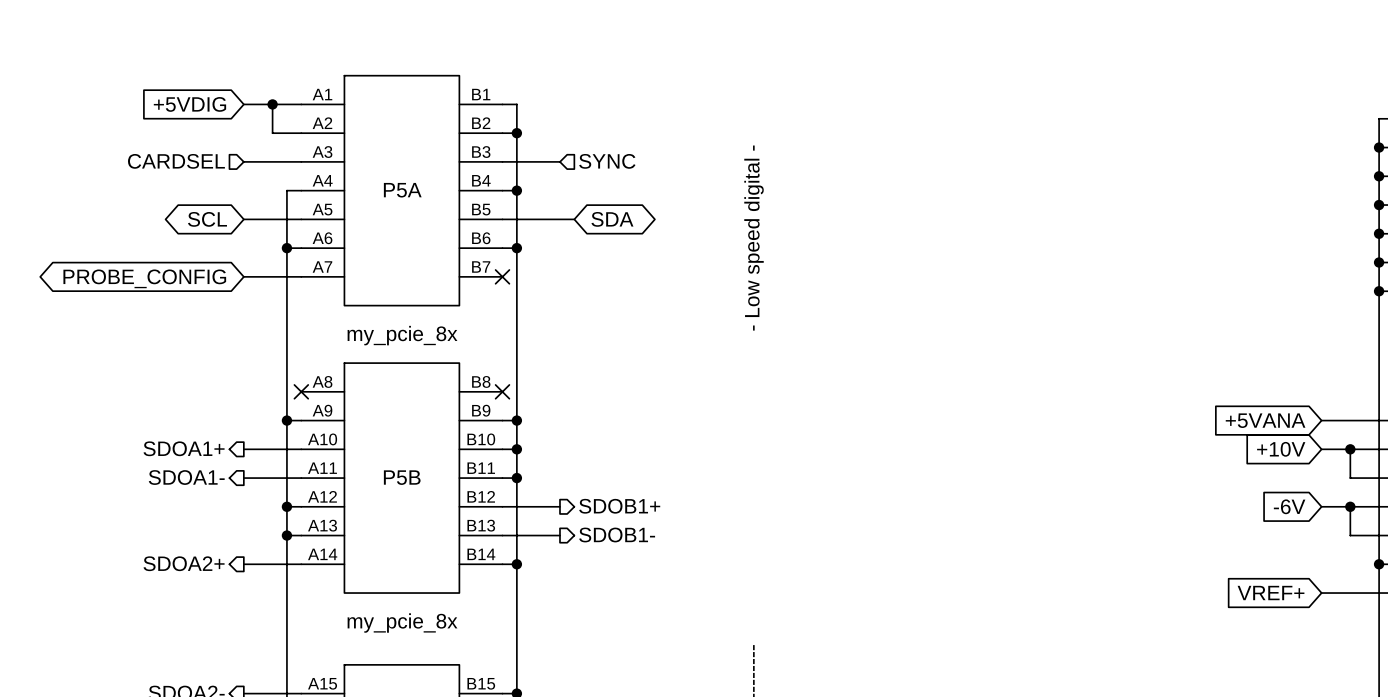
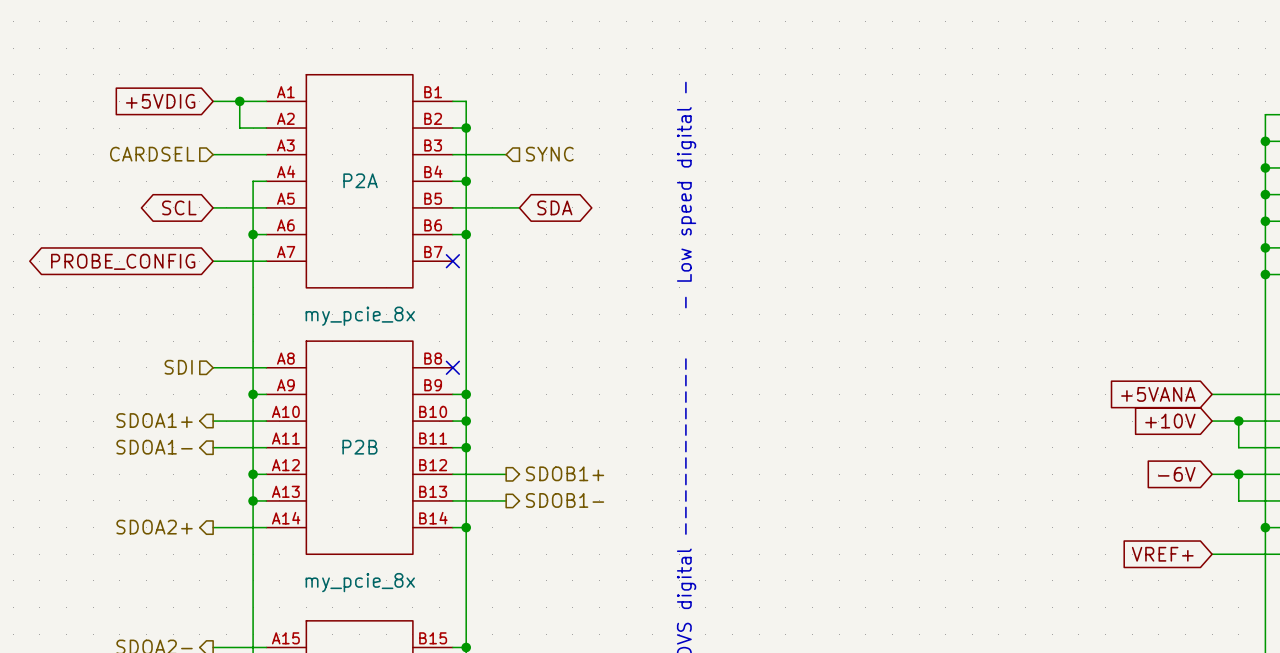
P5A name: P5A (402, 190) -> P2A (360, 180)
hierarchical label: none -> SDI (178, 367)
wire: none -> (213, 367) (266, 367)
no-connect mark: (301, 391) -> none
P5B name: P5B (402, 477) -> P2B (359, 447)

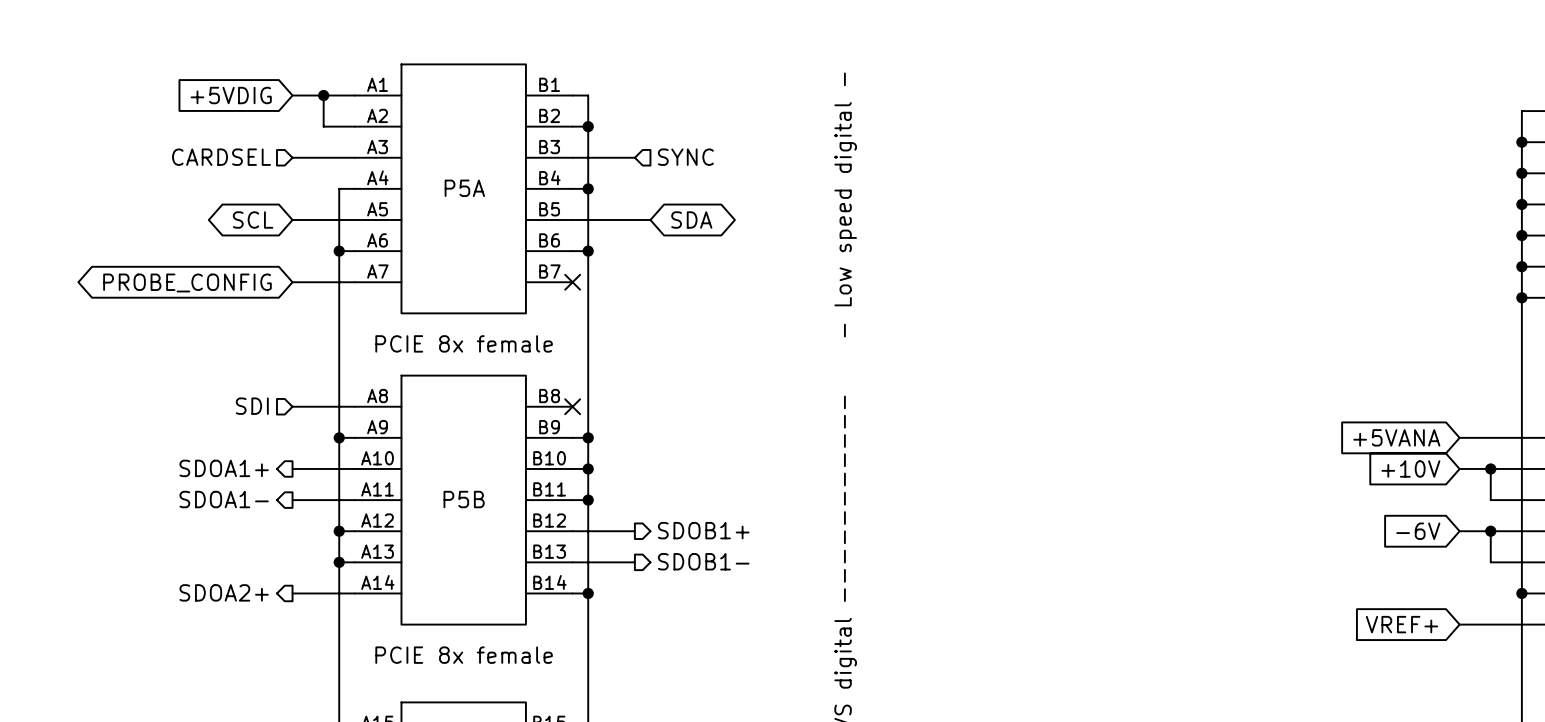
P2A name: P2A (360, 180) -> P5A (464, 188)
P2A value: my_pcie_8x (360, 316) -> PCIE 8x female (464, 343)
P2B name: P2B (359, 447) -> P5B (464, 499)
P2B value: my_pcie_8x (360, 582) -> PCIE 8x female (464, 655)

